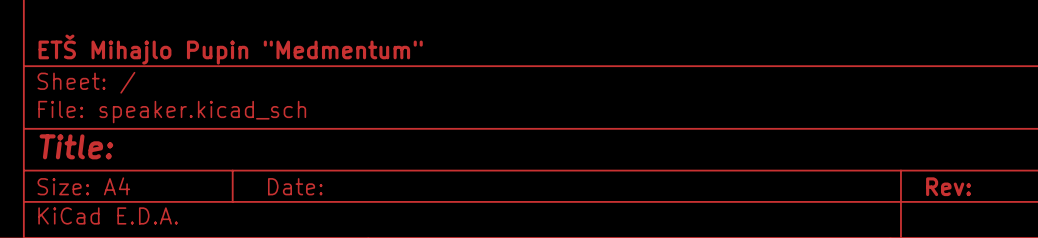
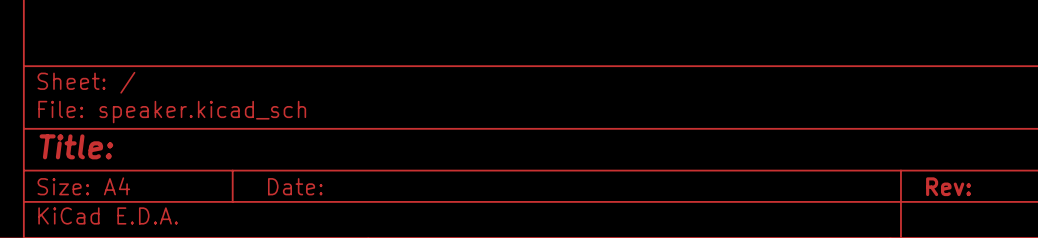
title block: ETŠ Mihajlo Pupin "Medmentum" (230, 49) -> none

